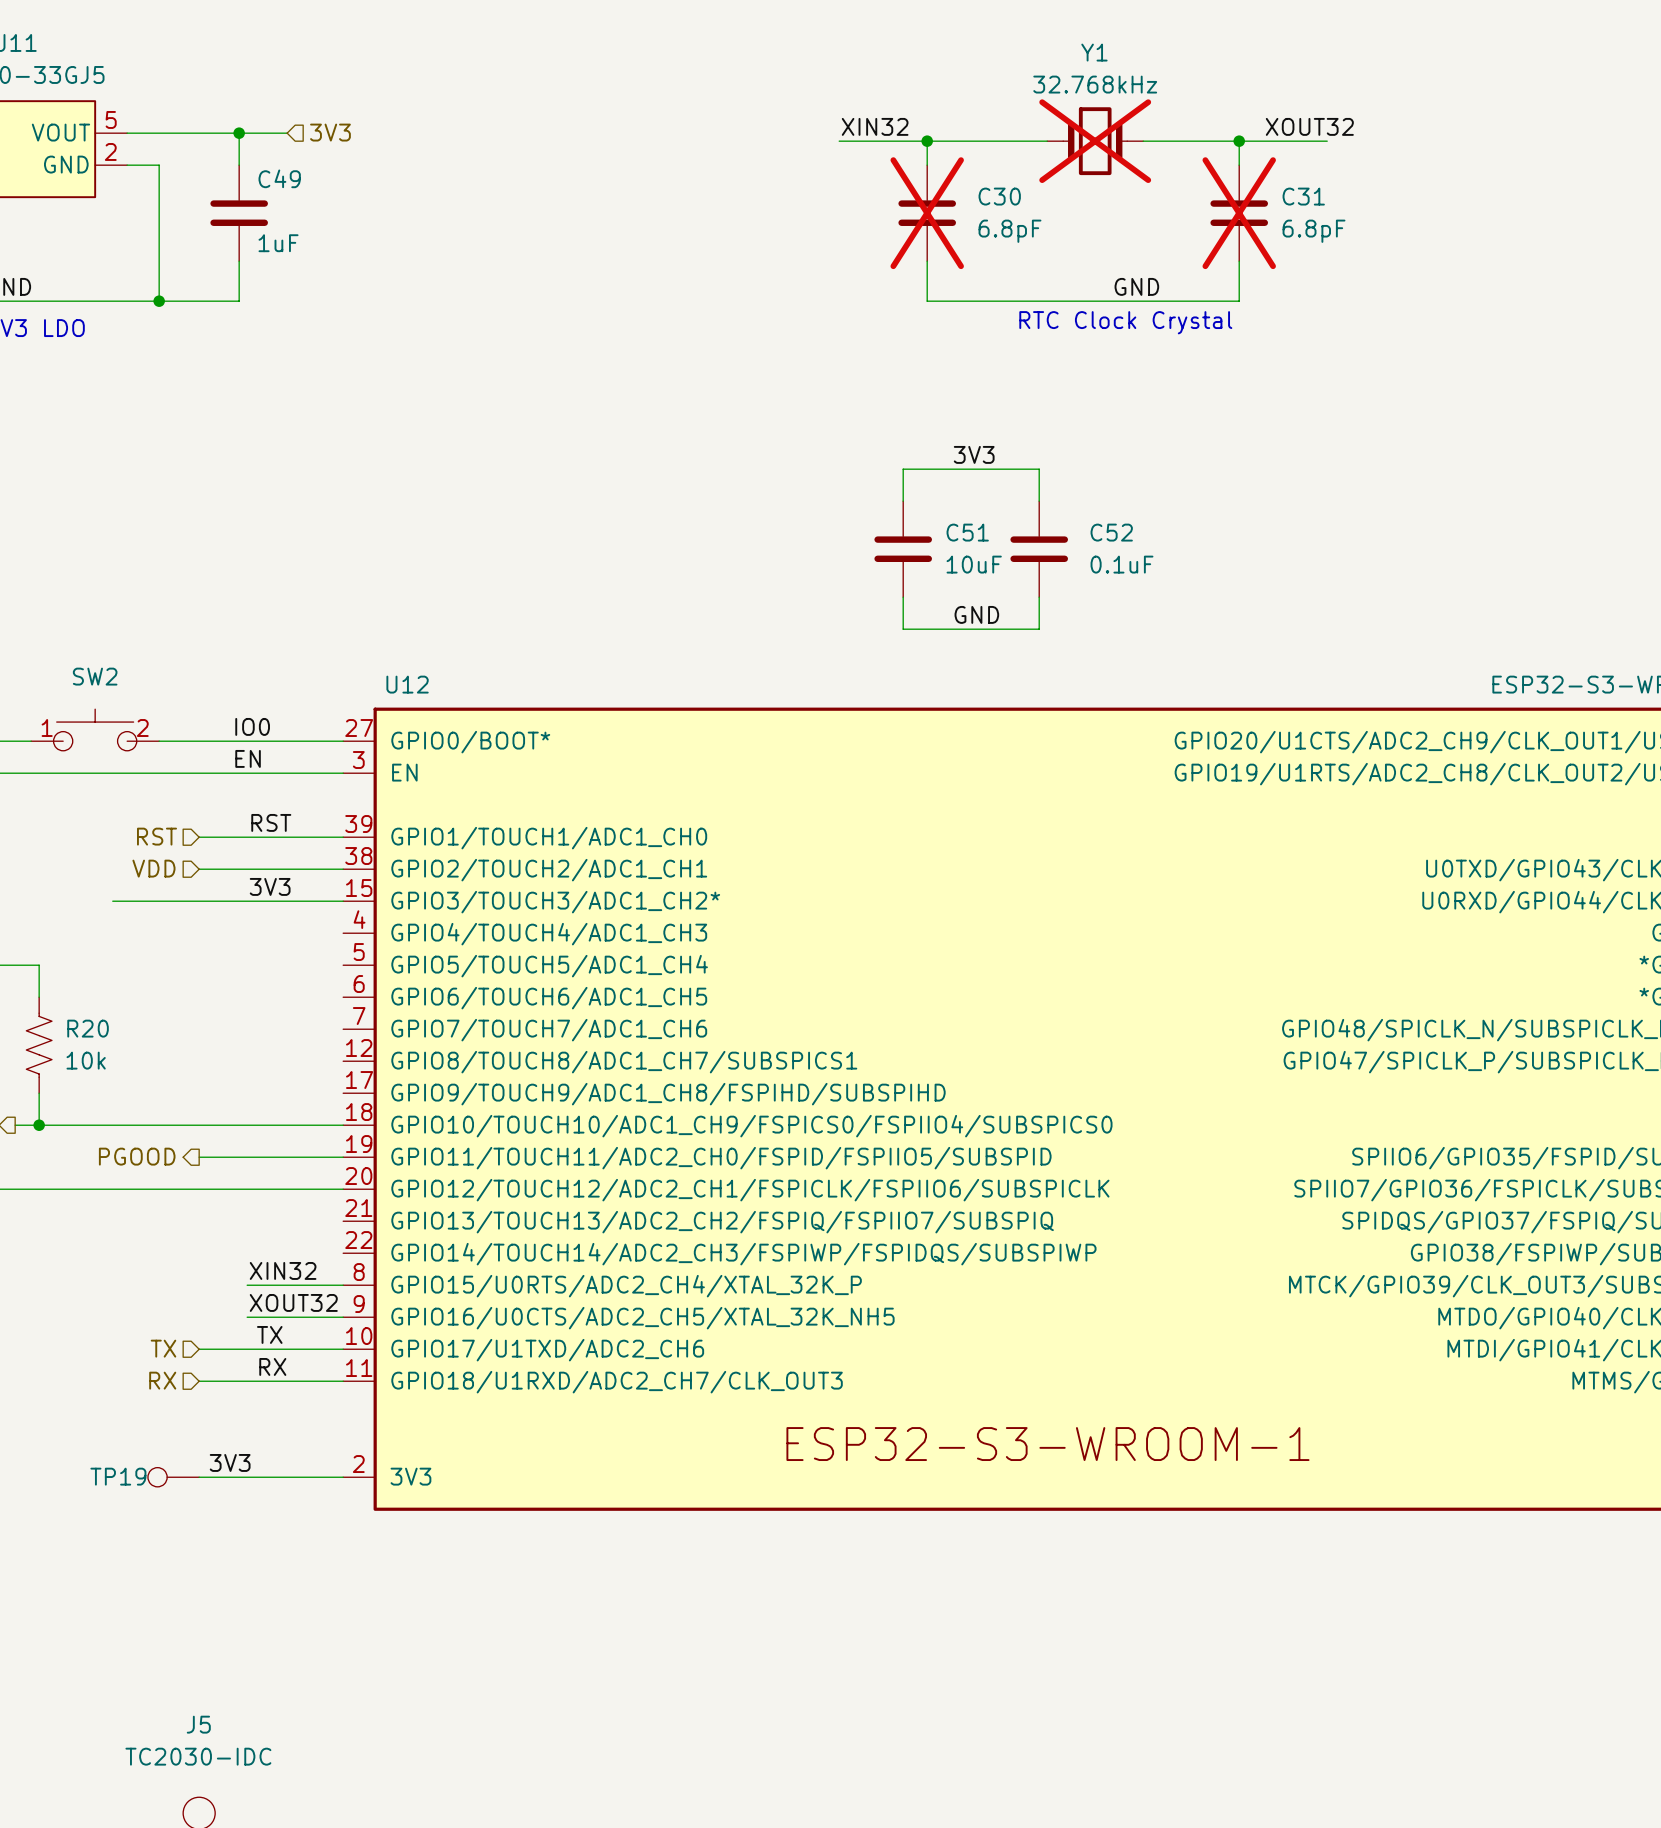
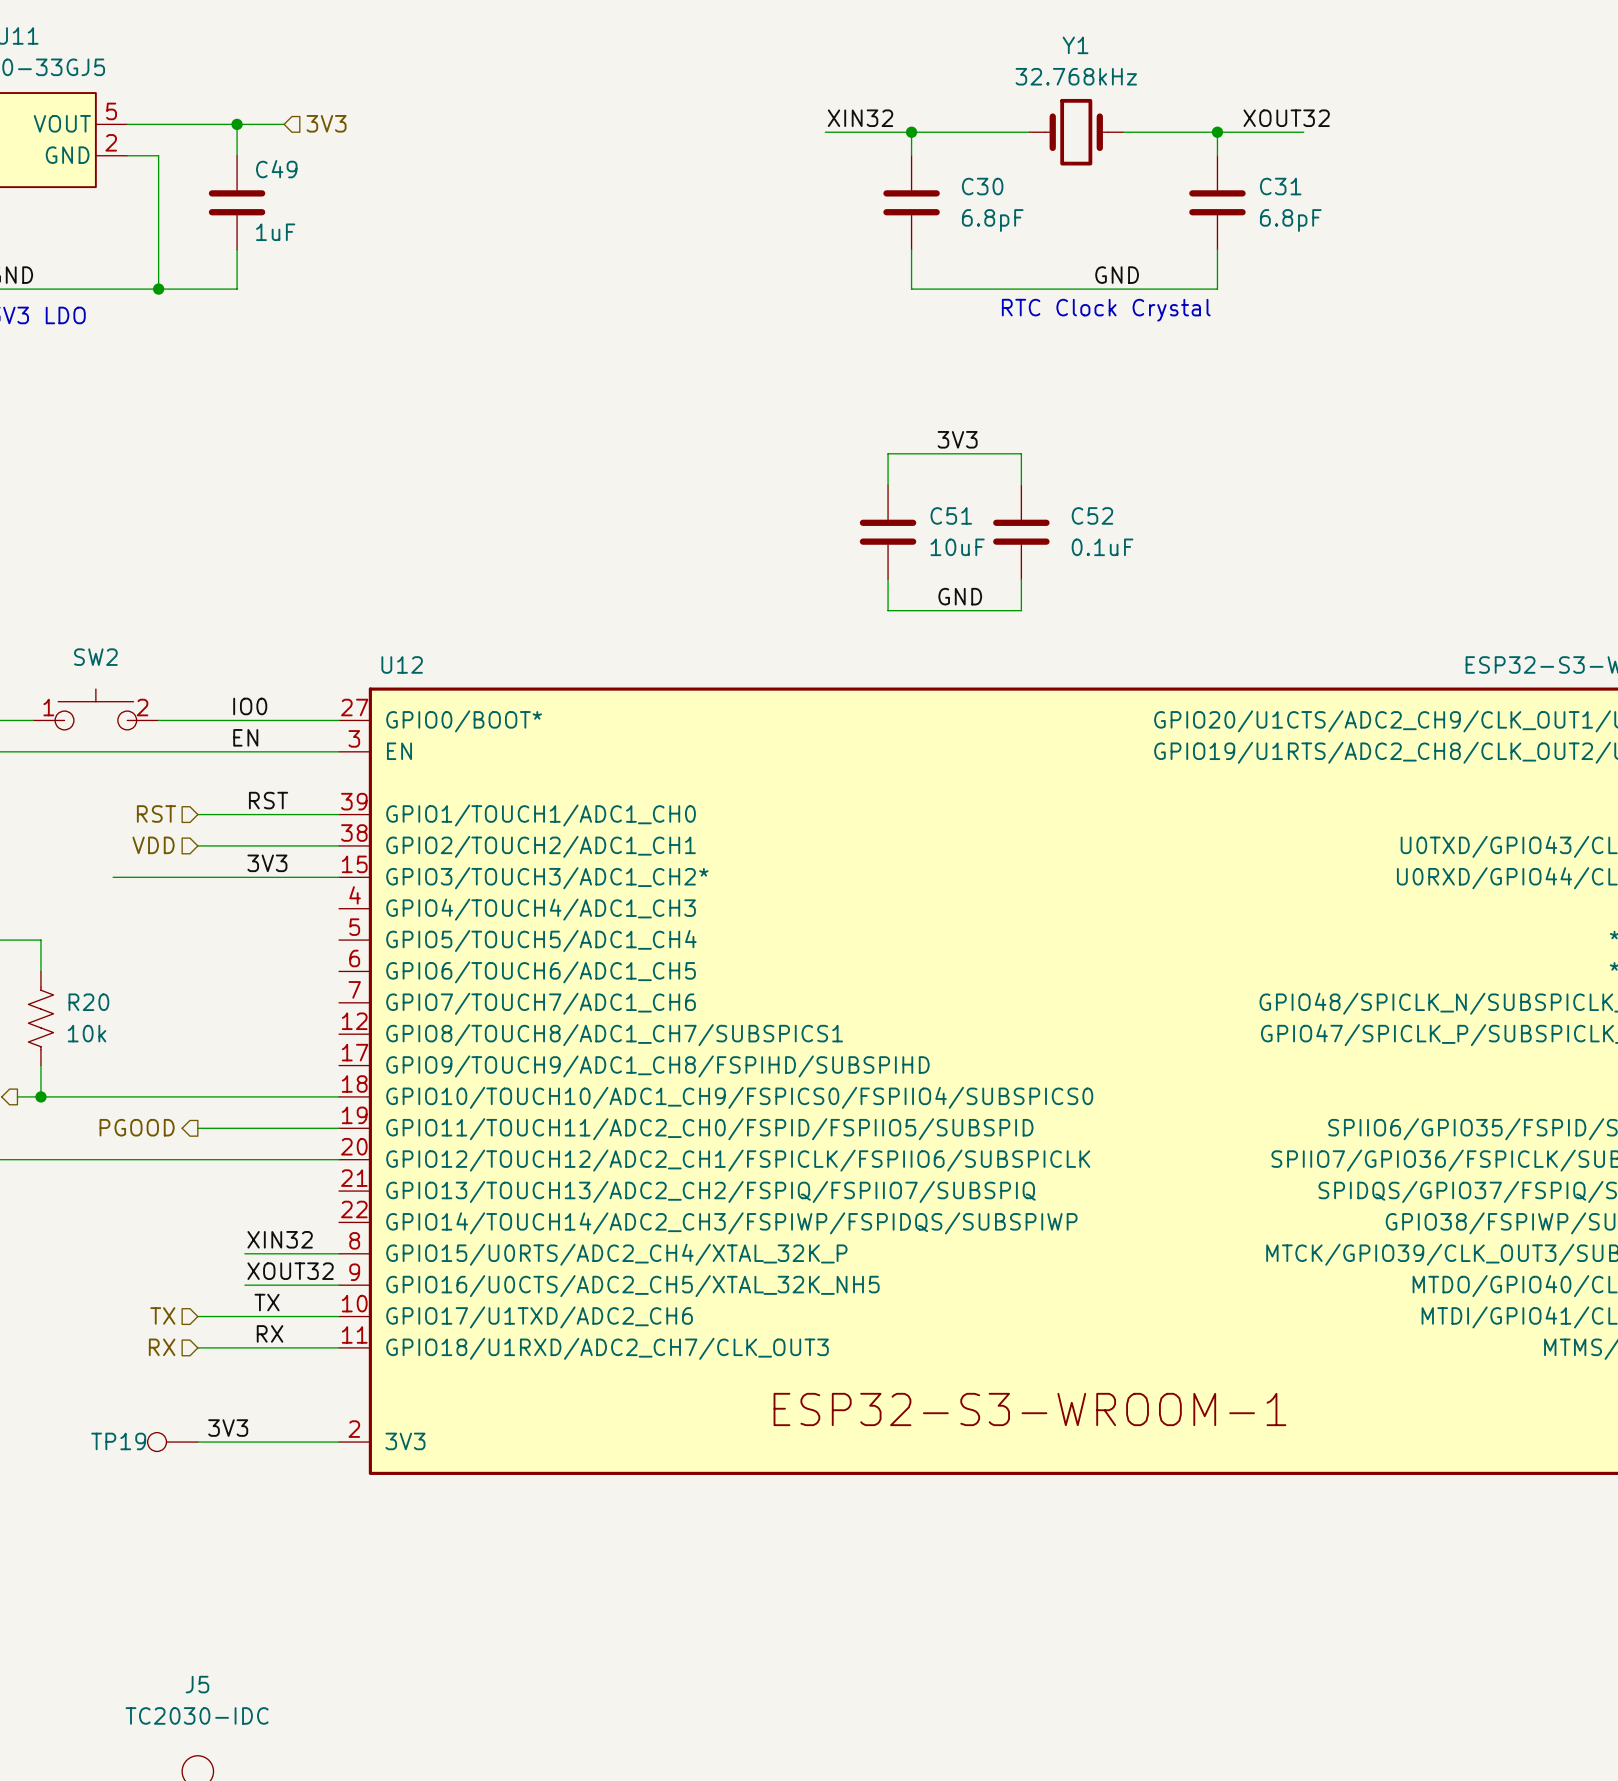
Y1 do-not-place cross: (1095, 141) -> none
C30 do-not-place cross: (927, 213) -> none
C31 do-not-place cross: (1239, 213) -> none

